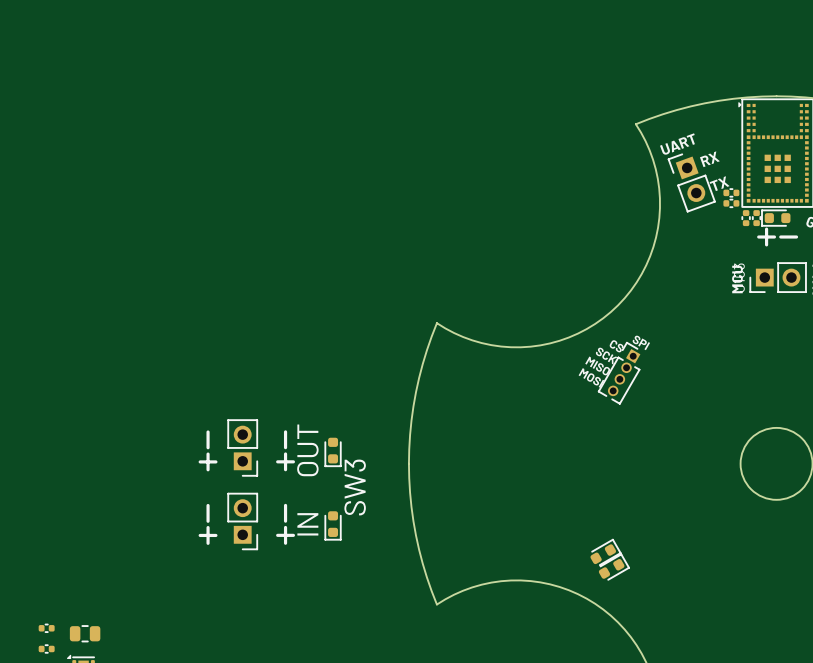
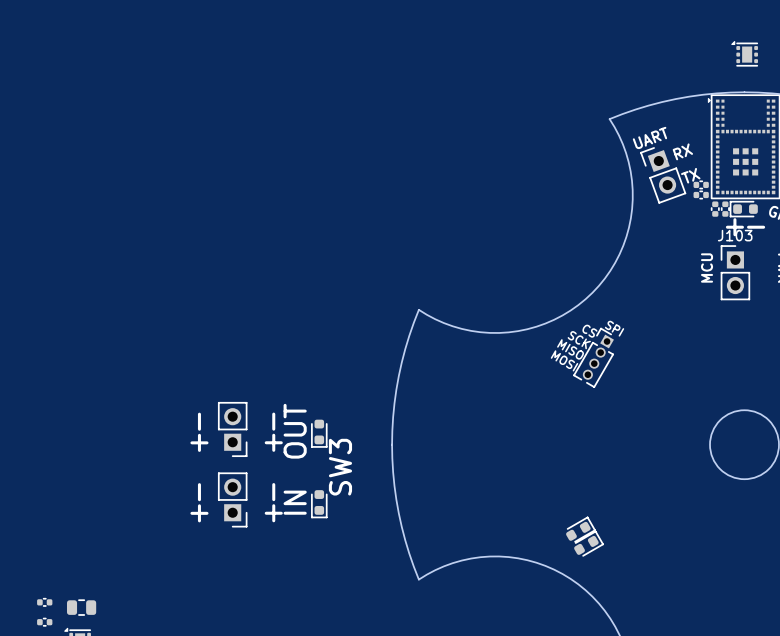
part: none -> (744, 53)
J103 rotation: 0° (778, 277) -> 90° clockwise (735, 272)

